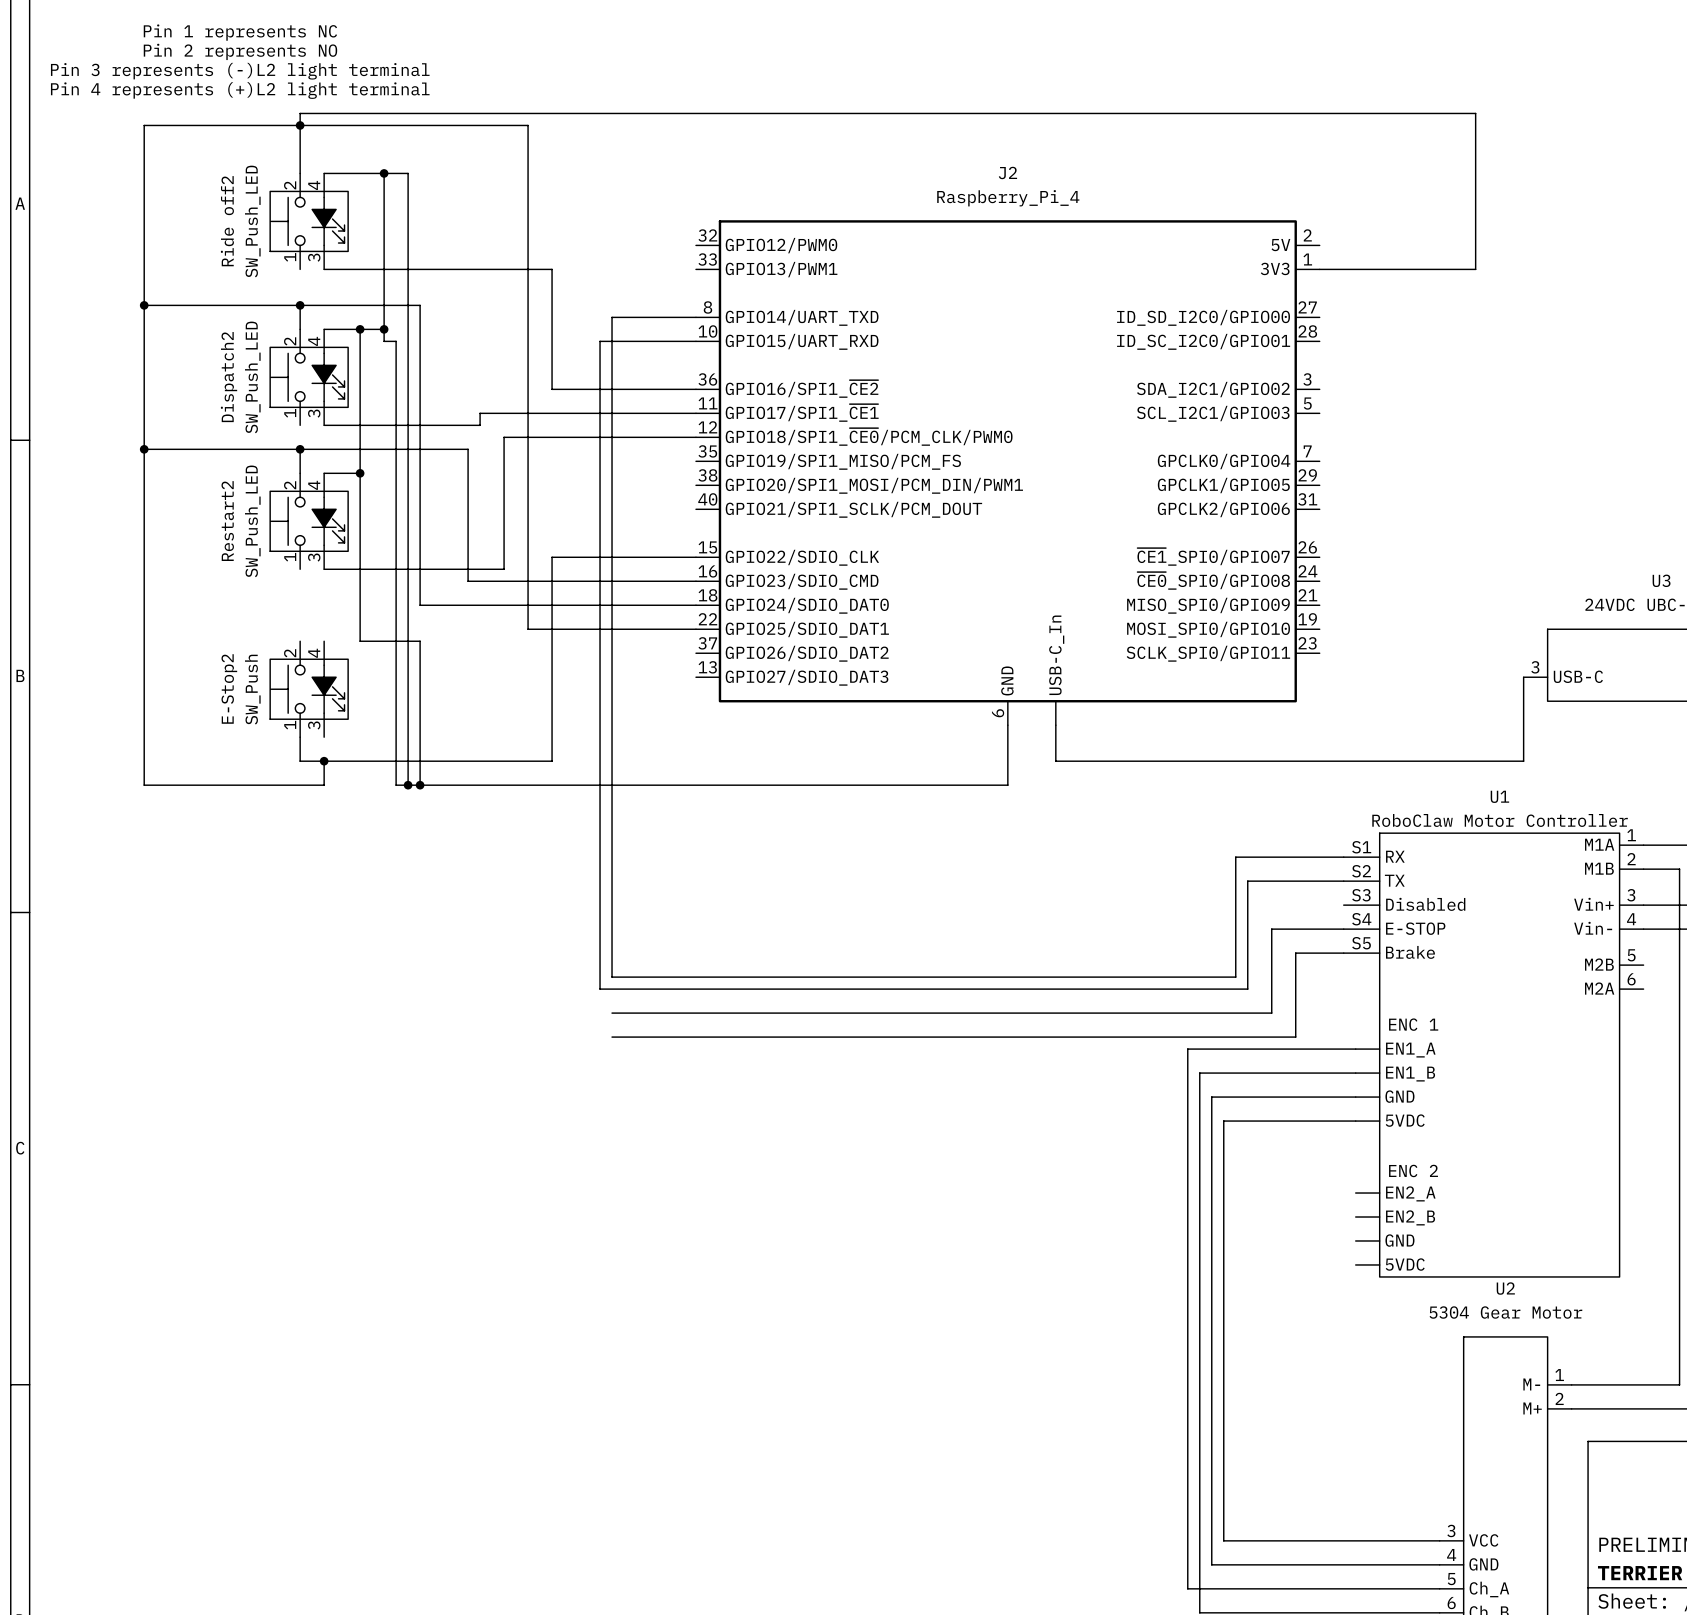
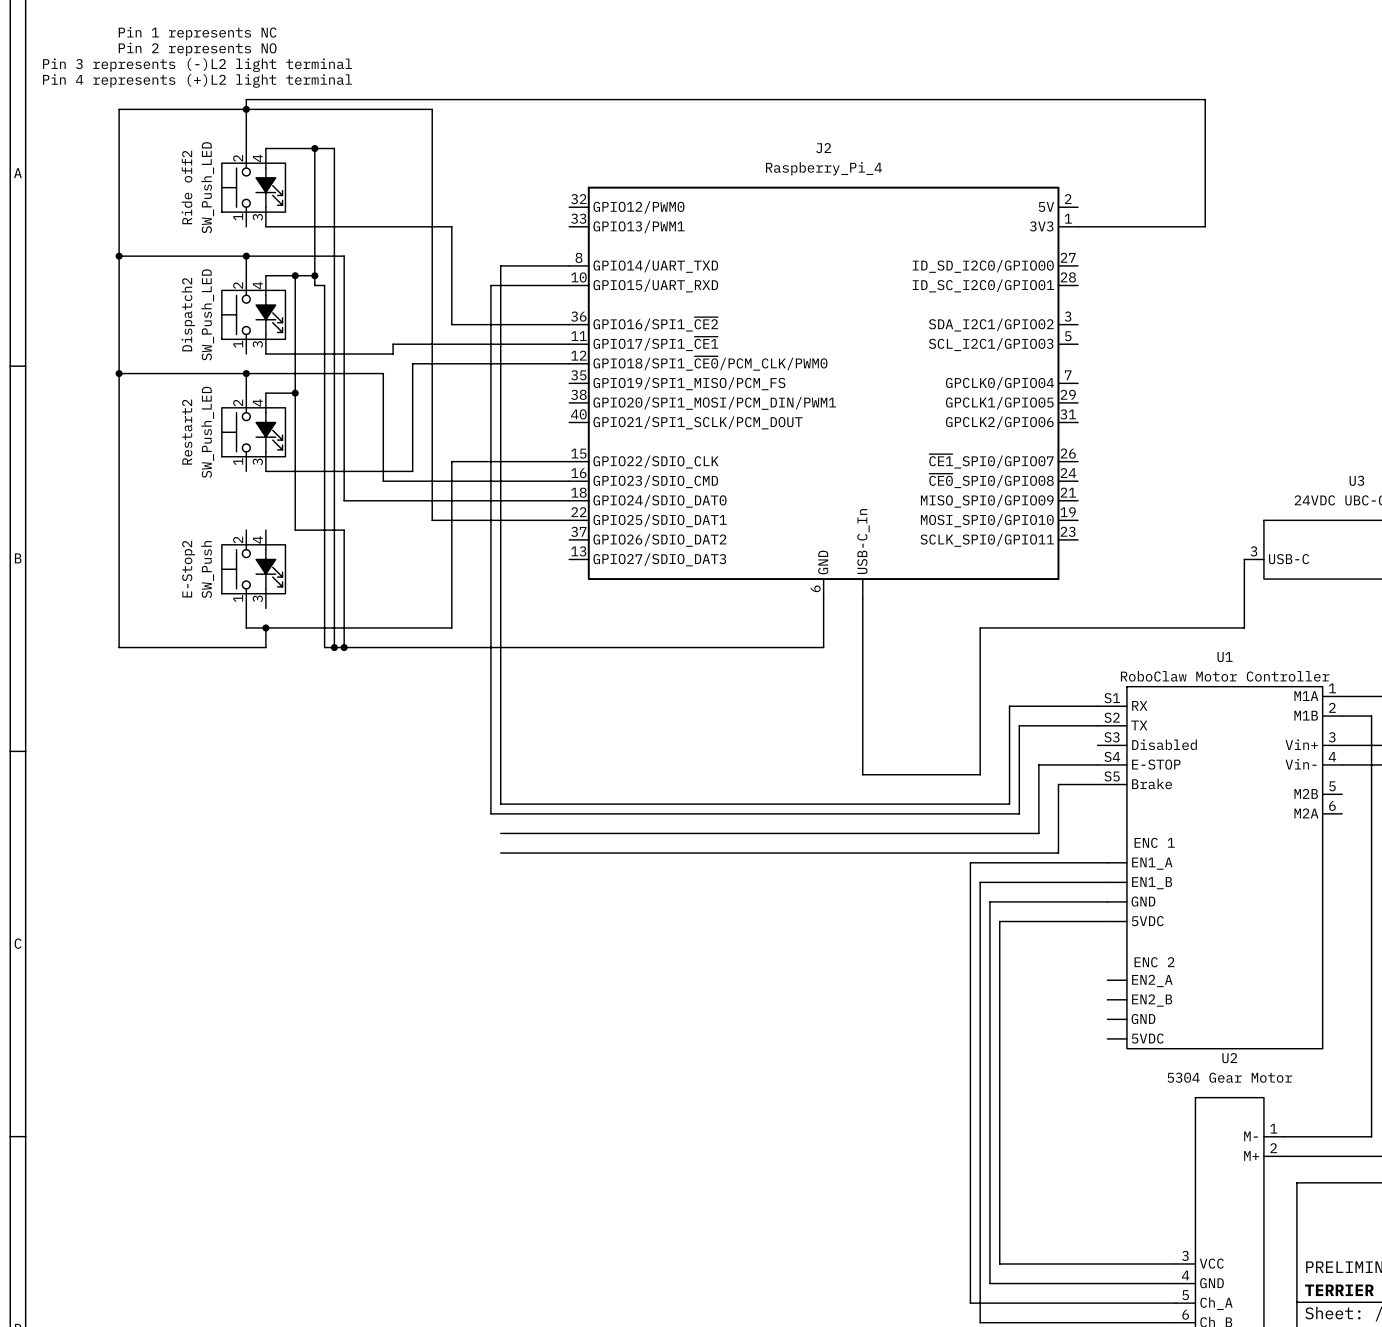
wire: (1055, 761) (1199, 761) -> (862, 627) (862, 774) (980, 774) (980, 627)

